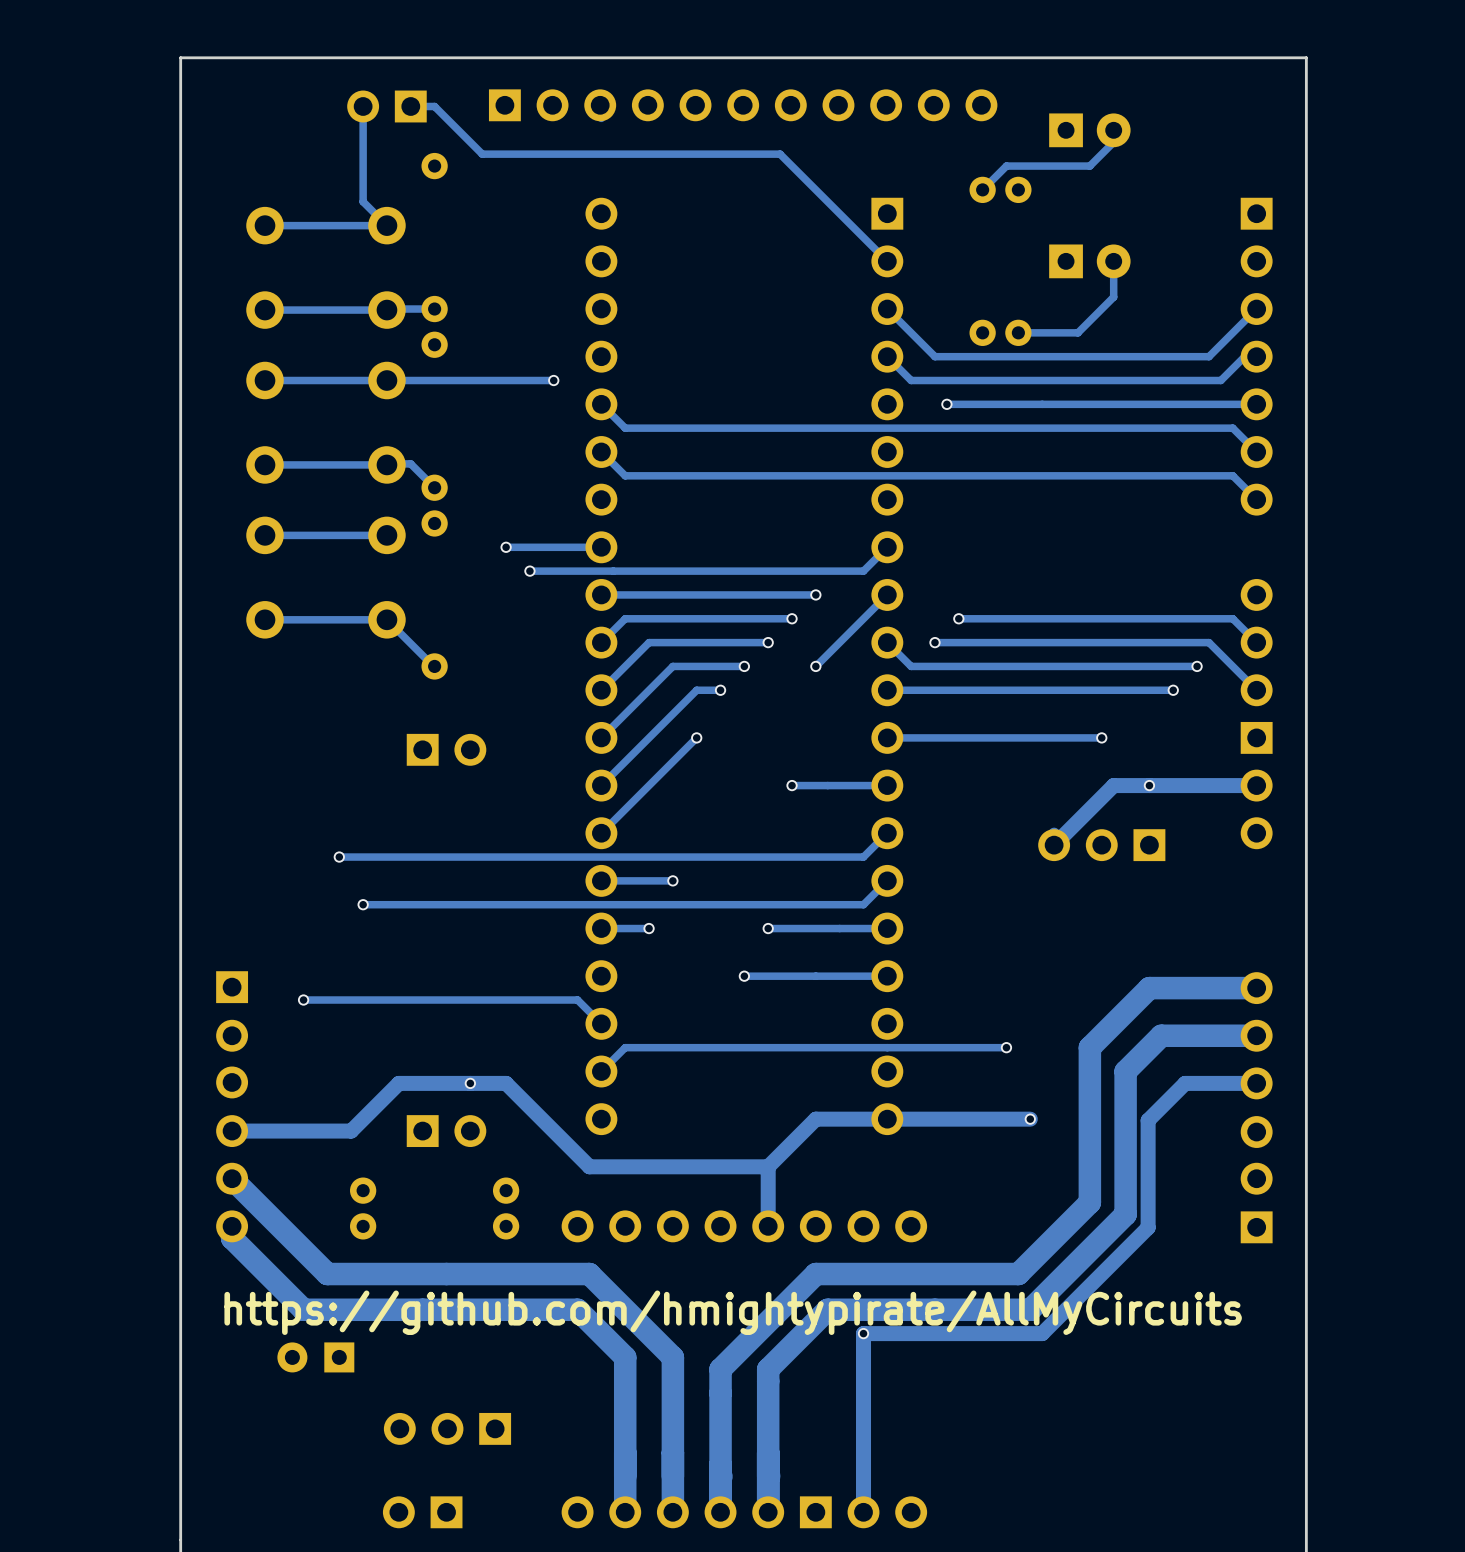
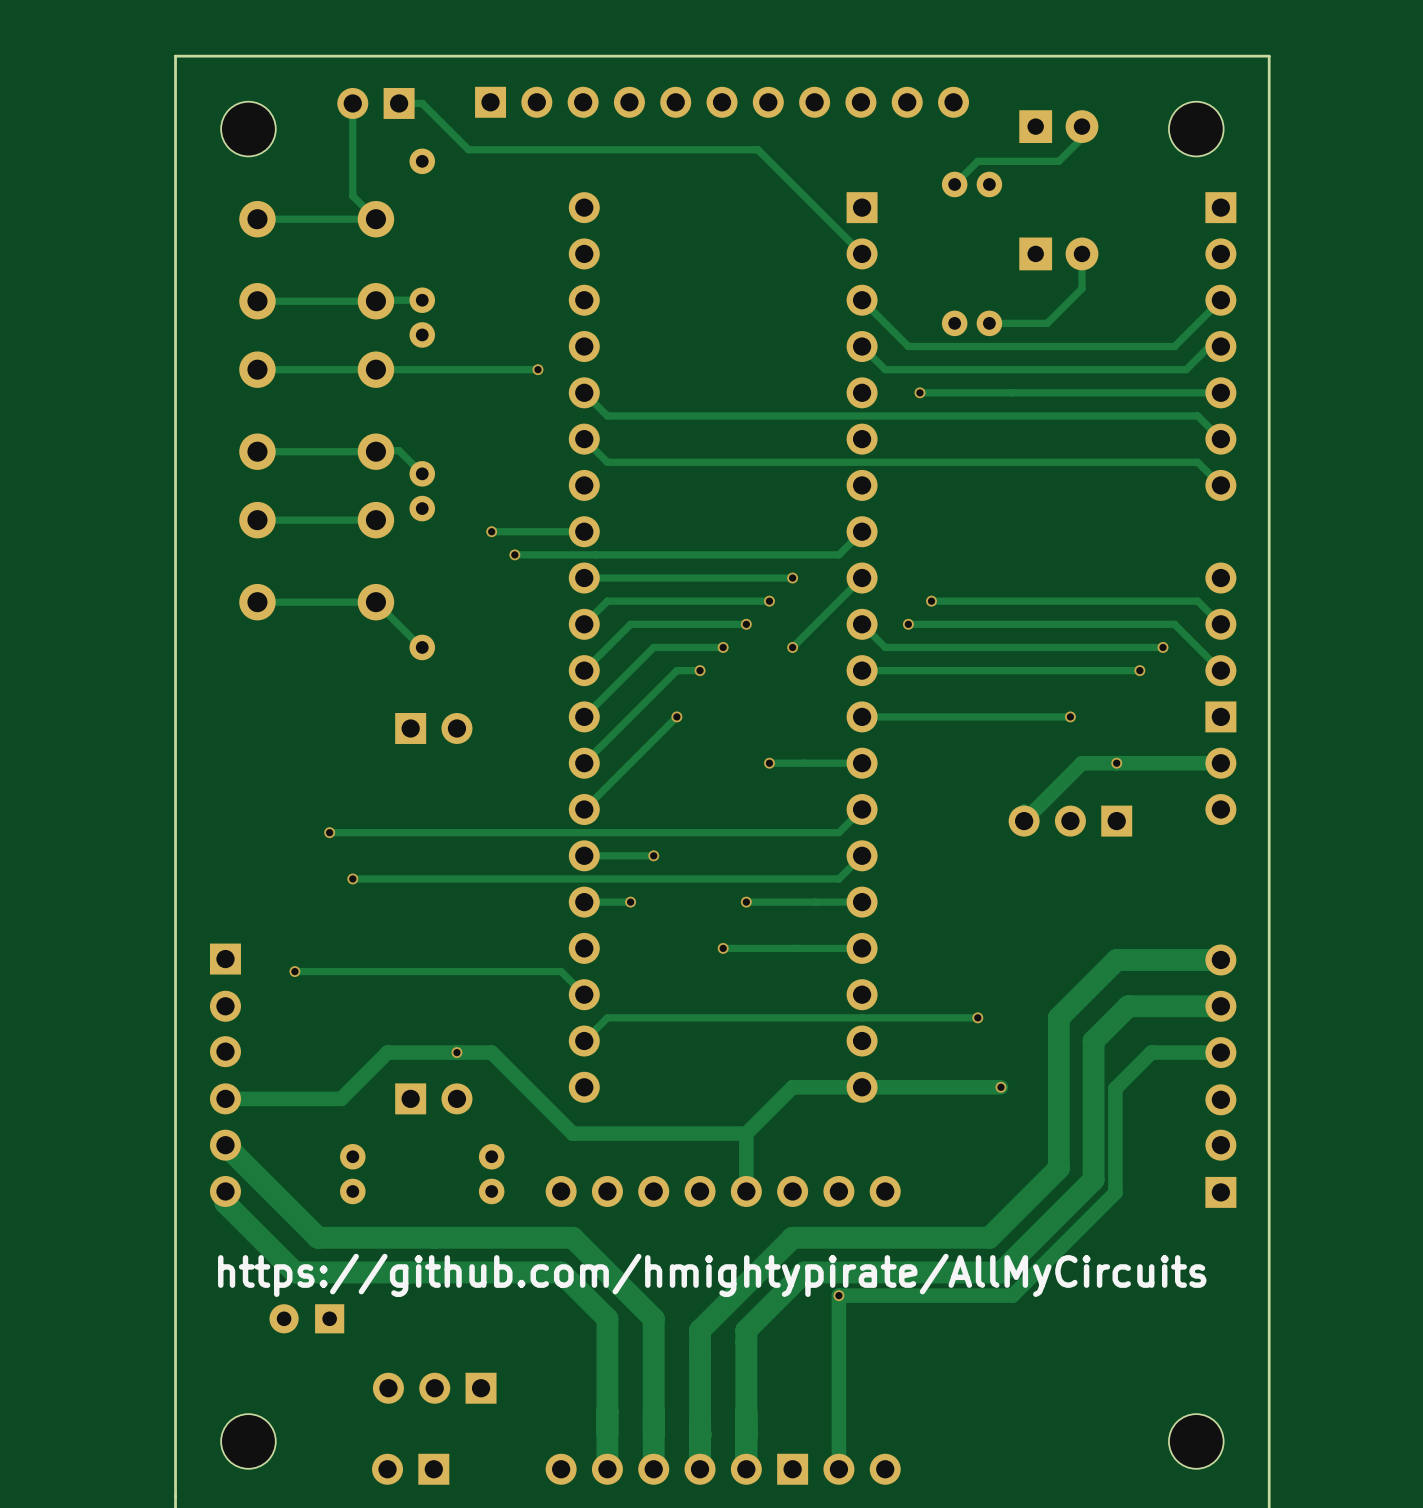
part: none -> (248, 129)
part: none -> (1196, 129)
part: none -> (248, 1441)
part: none -> (1196, 1441)

